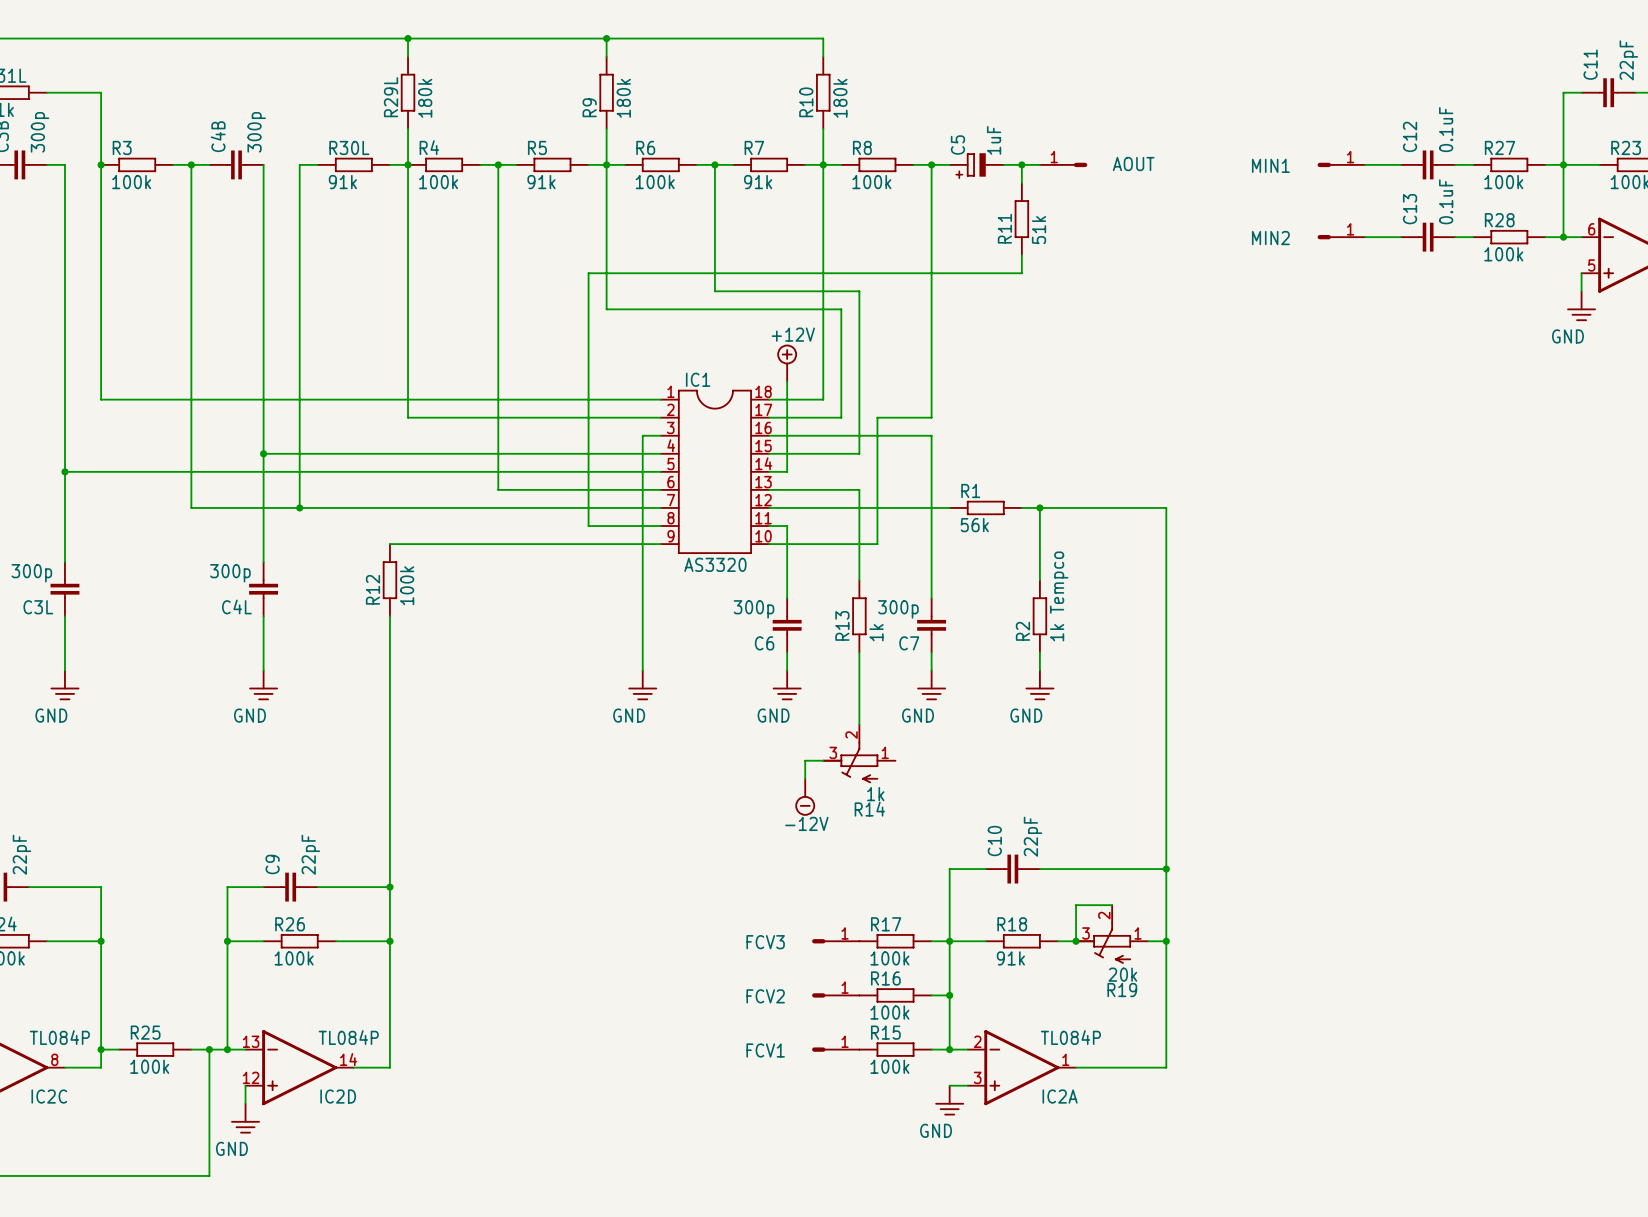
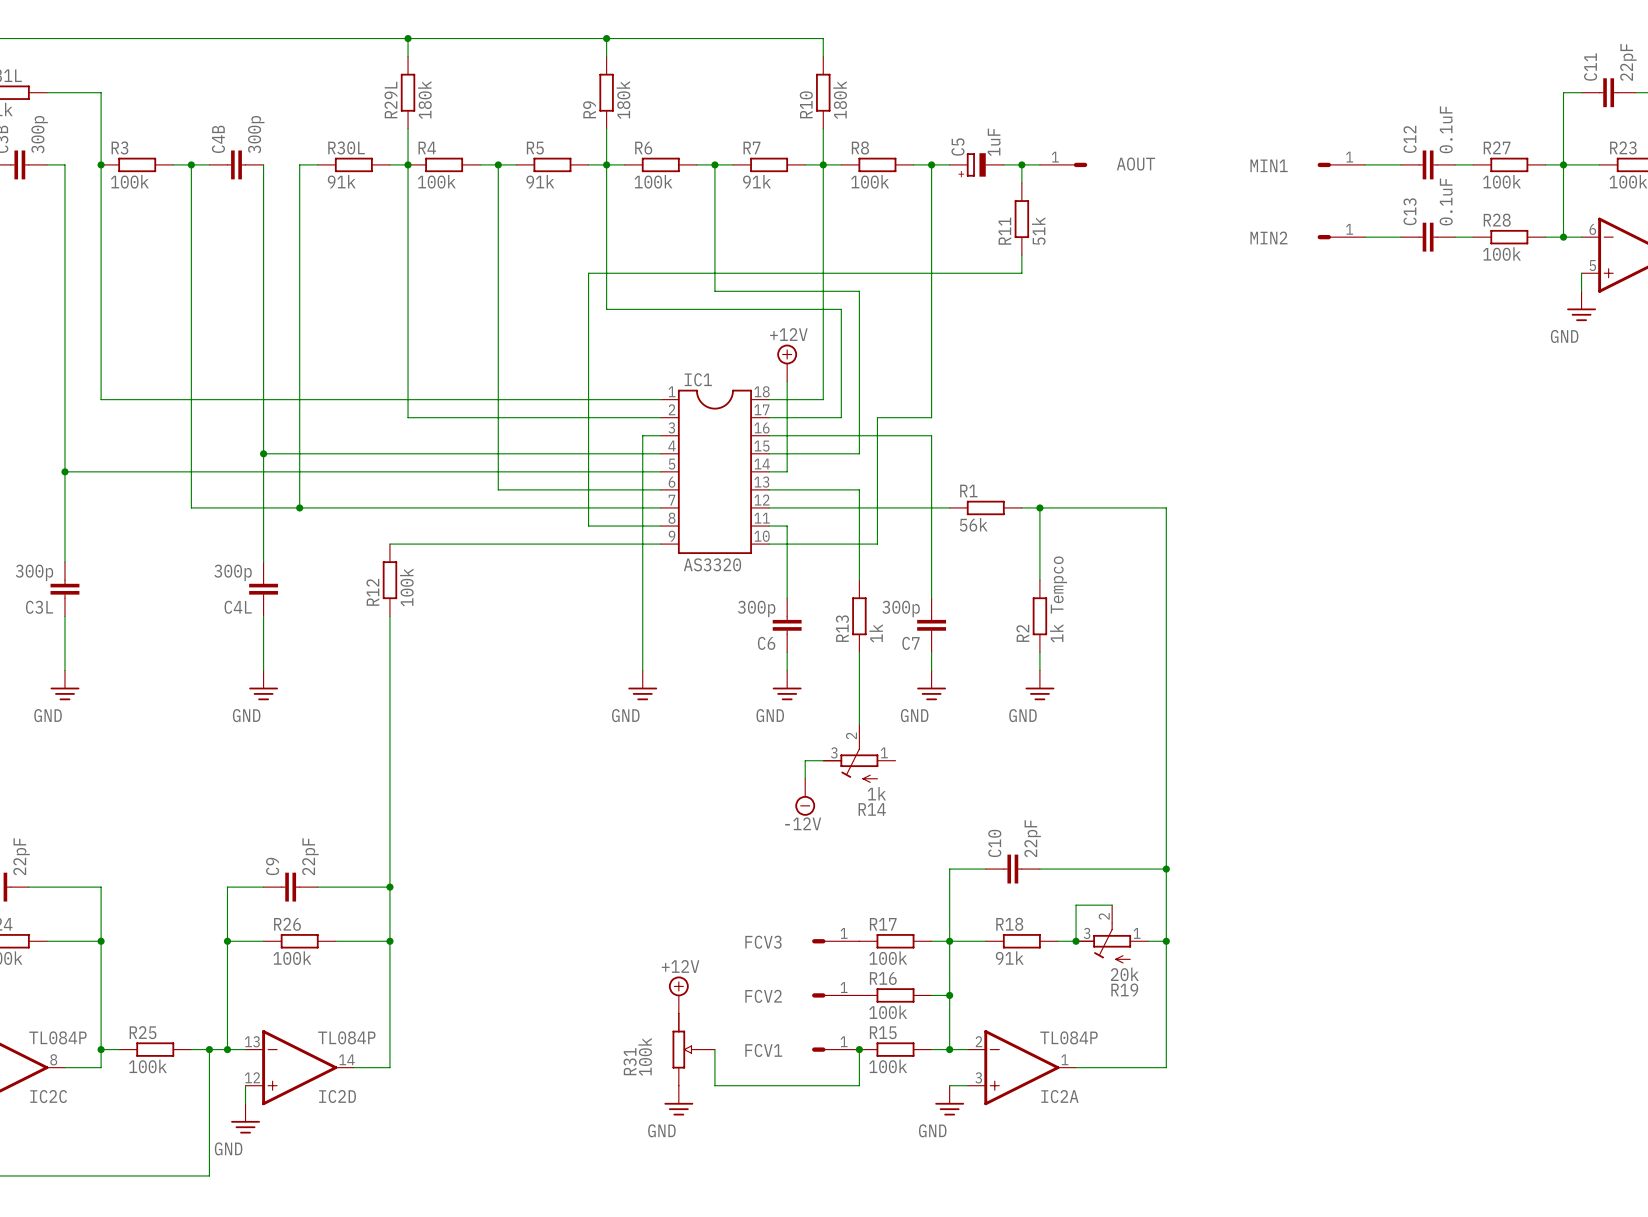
power symbol: none -> +12V (678, 994)
R31: none -> 100k (693, 1049)
wire: none -> (714, 1049) (714, 1085) (859, 1085) (859, 1049)
junction: none -> (859, 1049)
power symbol: none -> GND (678, 1100)

